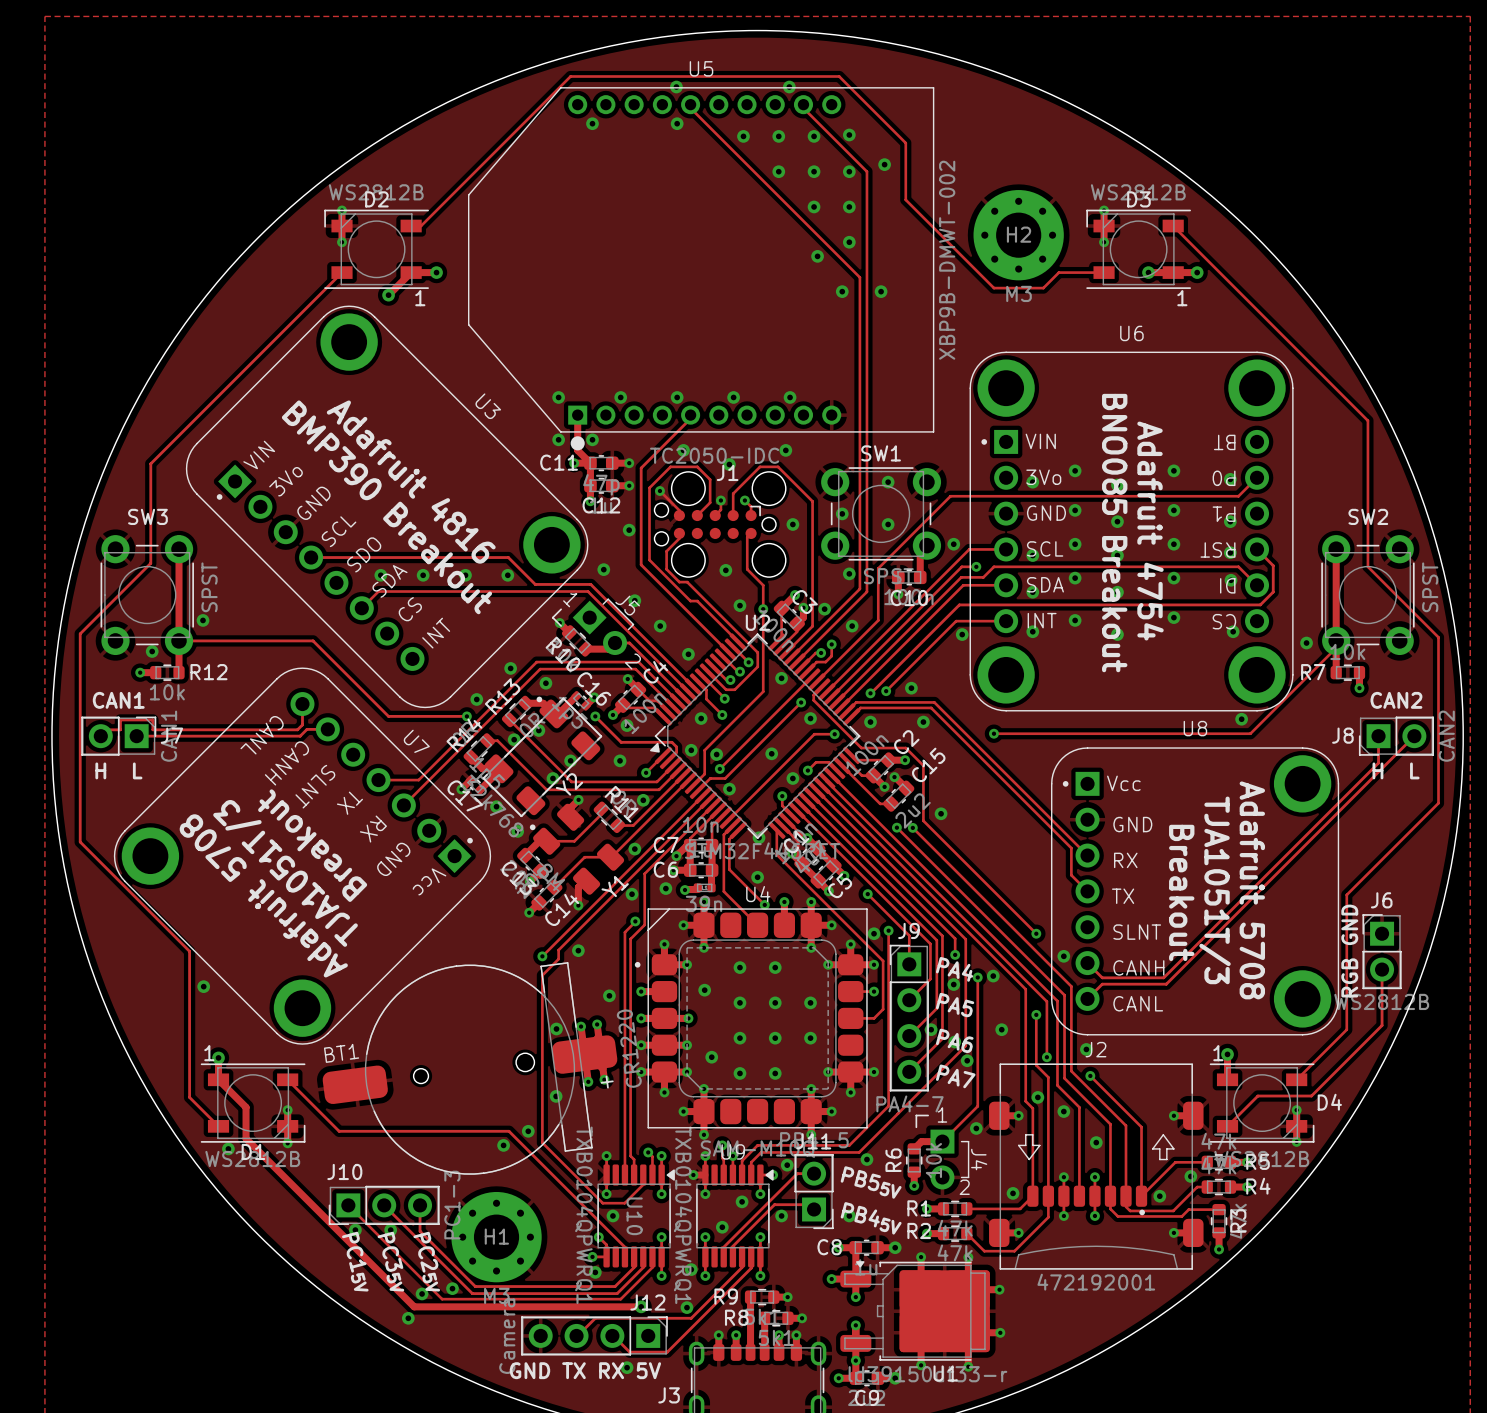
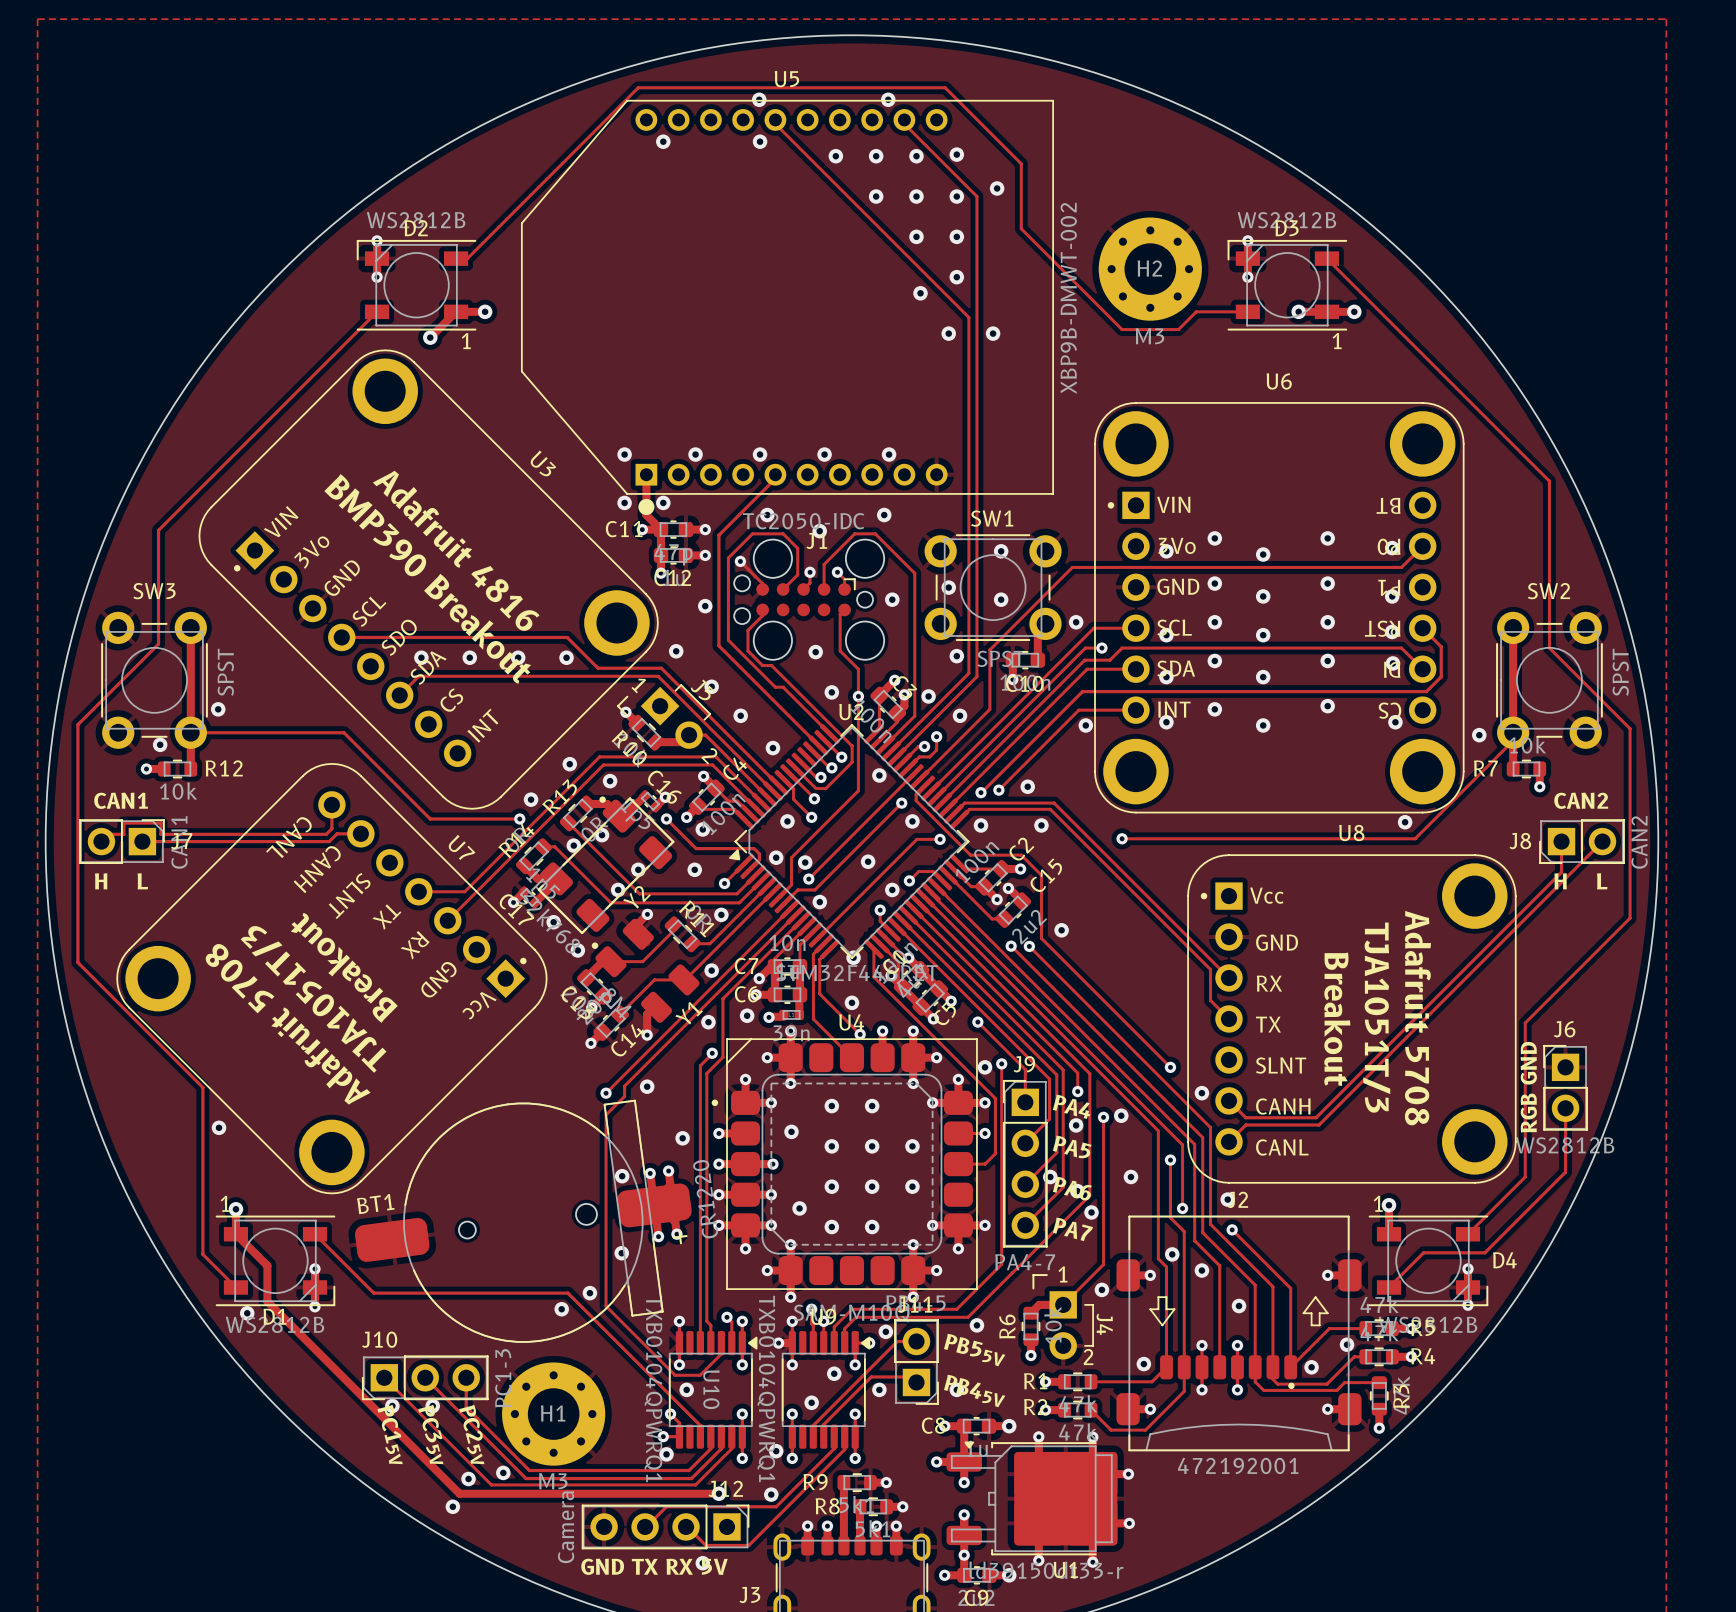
U6 footprint: [969, 351, 1294, 712] -> [1094, 402, 1465, 814]

